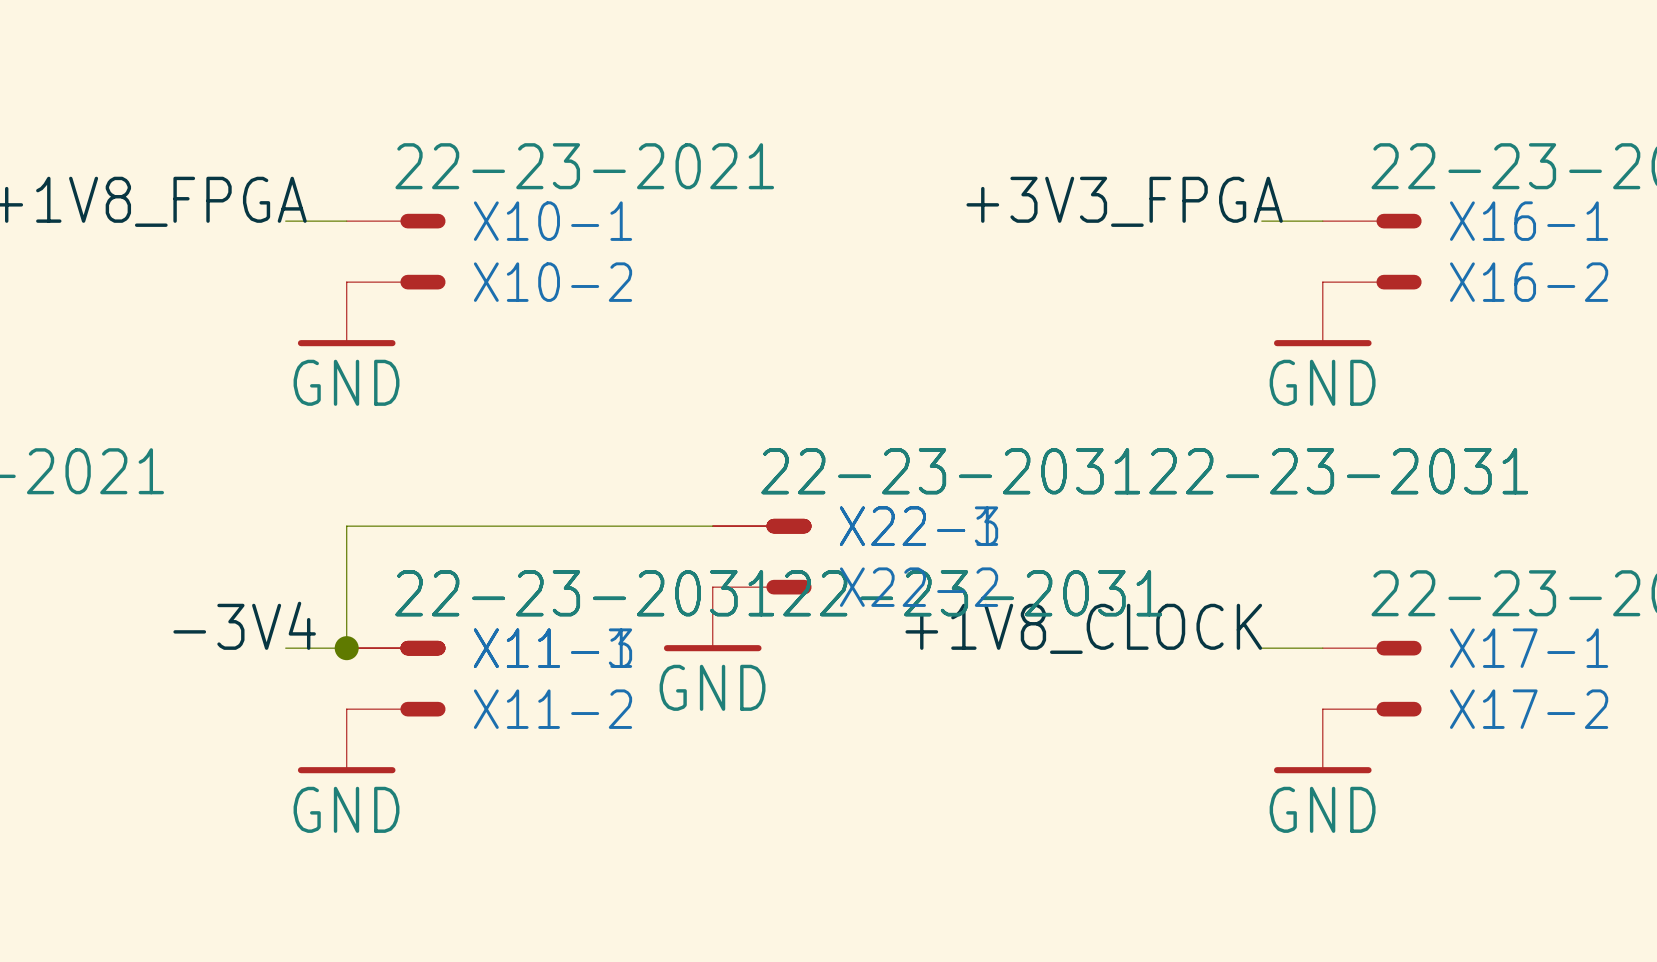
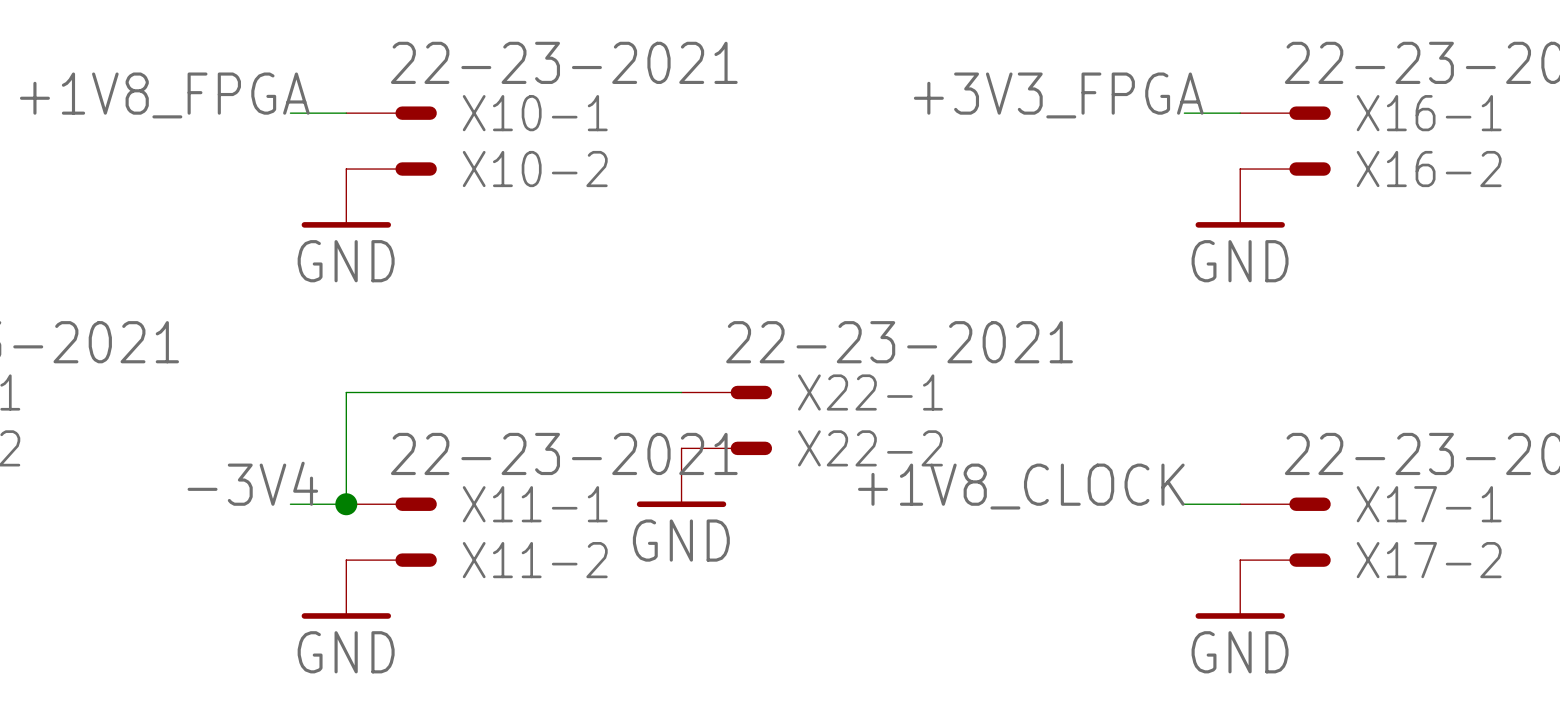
X22-1 value: 22-23-203122-23-2031 (1144, 471) -> 22-23-2021 (899, 342)
part: 22-23-203122-23-2031 (762, 526) -> none
X11-1 value: 22-23-203122-23-2031 (778, 593) -> 22-23-2021 (564, 453)
part: 22-23-203122-23-2031 (396, 648) -> none

